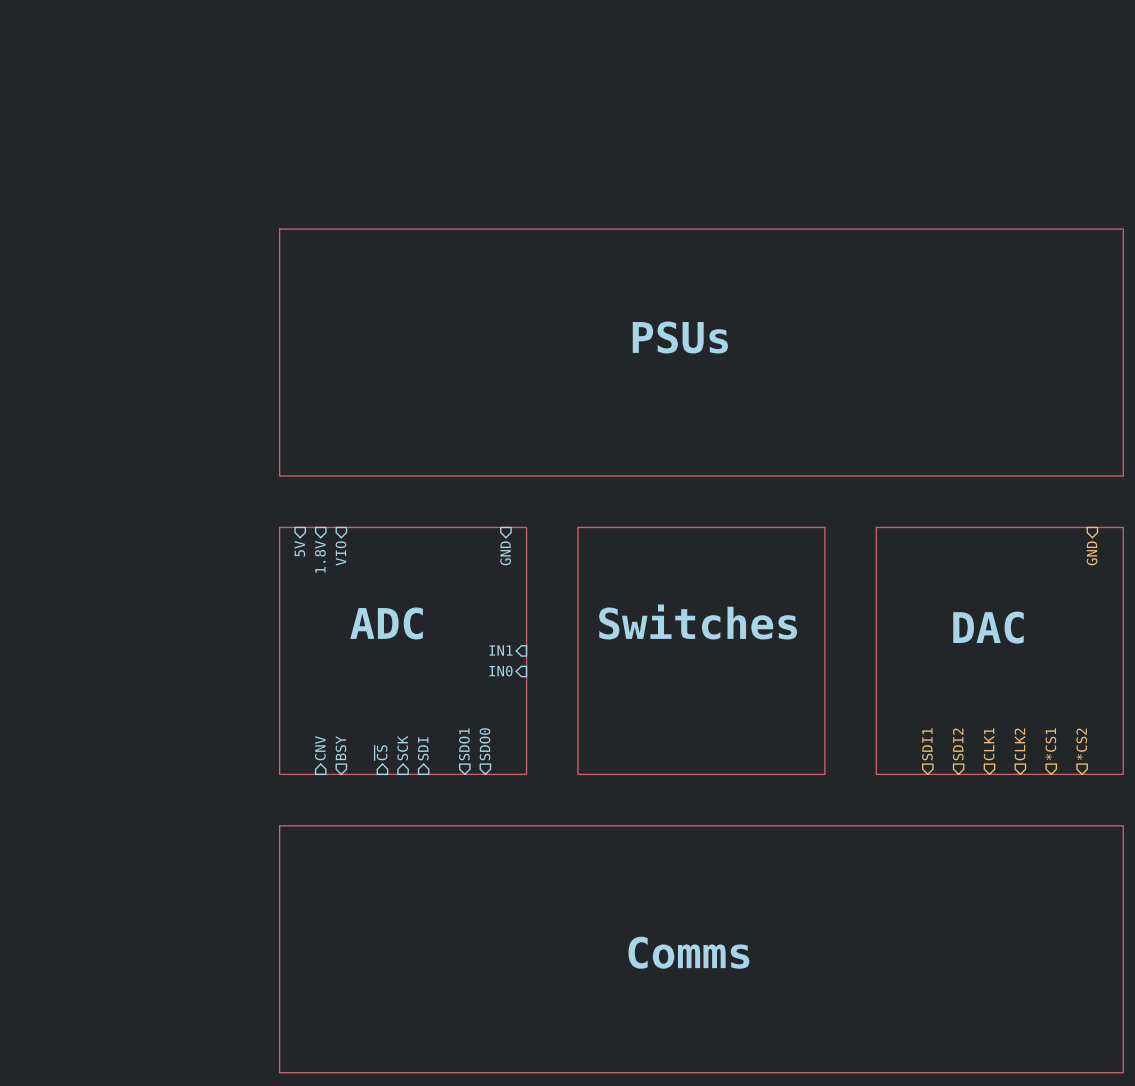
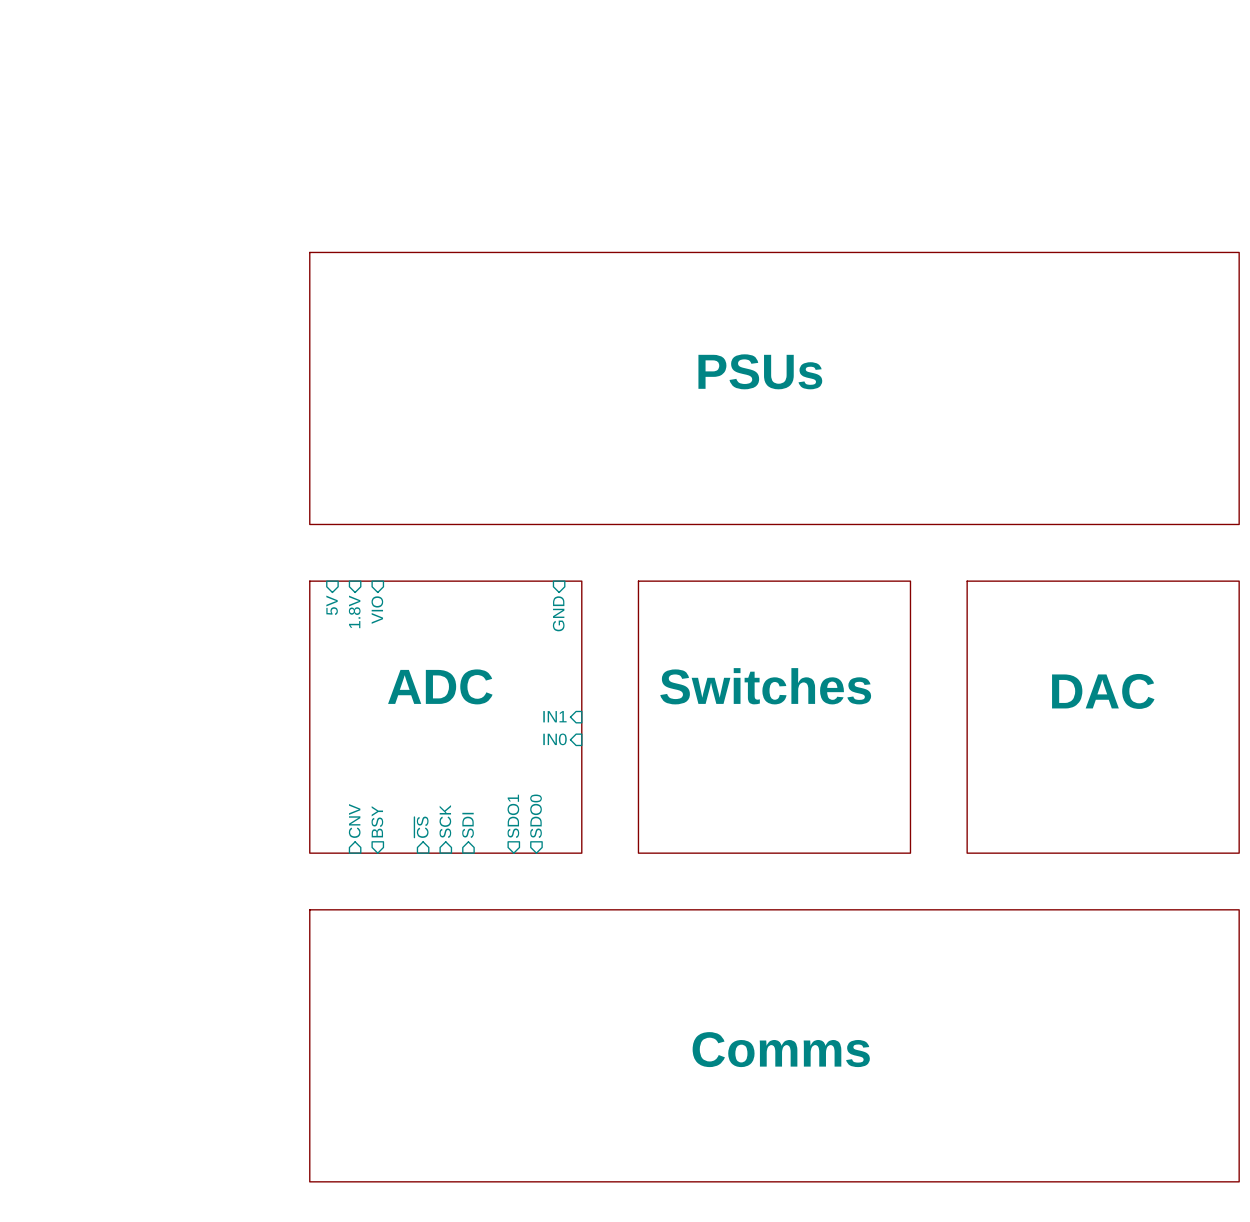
hierarchical label: GND (1092, 553) -> none
hierarchical label: SDI1 (927, 744) -> none
hierarchical label: SDI2 (958, 744) -> none
hierarchical label: CLK1 (989, 744) -> none
hierarchical label: CLK2 (1020, 744) -> none
hierarchical label: *CS1 (1050, 744) -> none
hierarchical label: *CS2 (1081, 744) -> none

